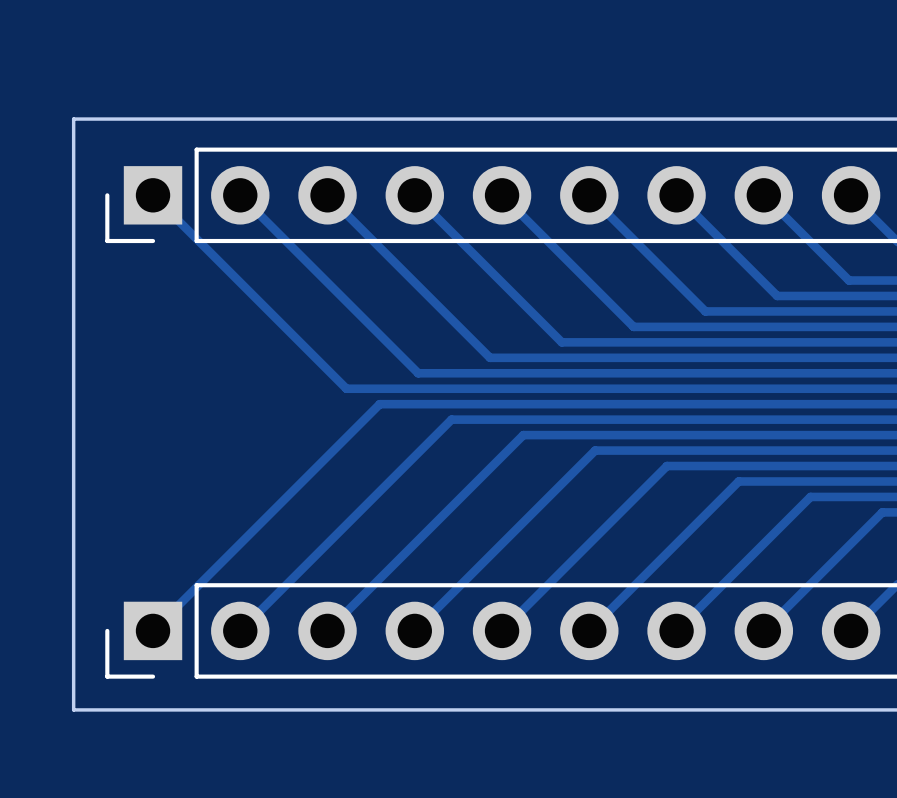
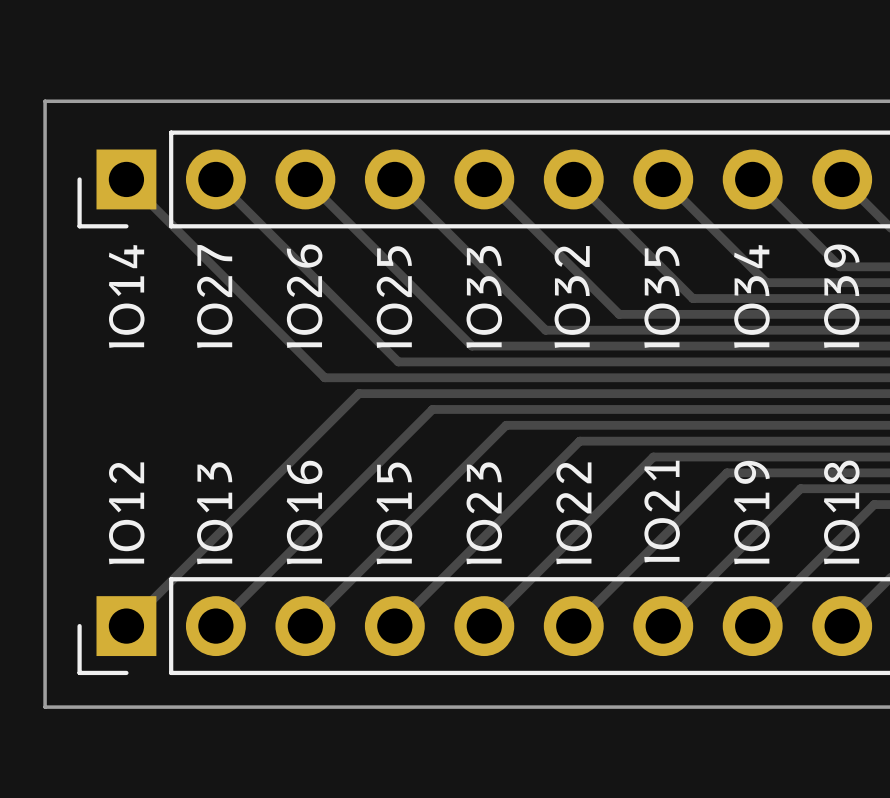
text: none -> IO14 (126, 296)
text: none -> IO27 (214, 296)
text: none -> IO34 (751, 296)
text: none -> IO26 (304, 296)
text: none -> IO25 (394, 297)
text: none -> IO33 (484, 296)
text: none -> IO32 (572, 296)
text: none -> IO35 (662, 297)
text: none -> IO39 (841, 296)
text: none -> IO21 (662, 511)
text: none -> IO12 (126, 513)
text: none -> IO13 (214, 513)
text: none -> IO16 (304, 512)
text: none -> IO15 (394, 513)
text: none -> IO23 (484, 513)
text: none -> IO22 (574, 513)
text: none -> IO19 (751, 512)
text: none -> IO18 (841, 512)

